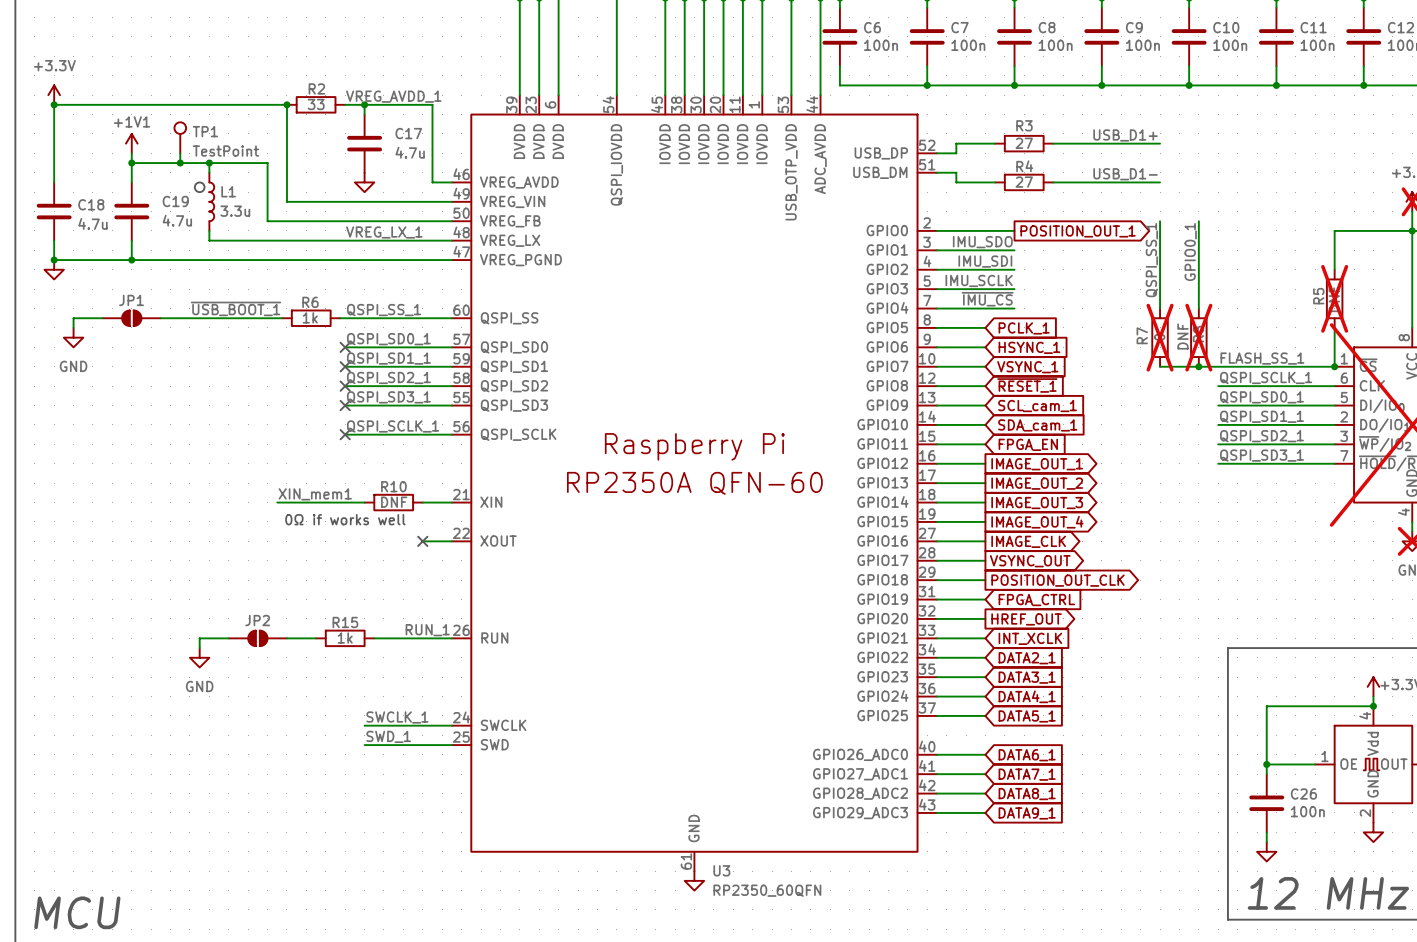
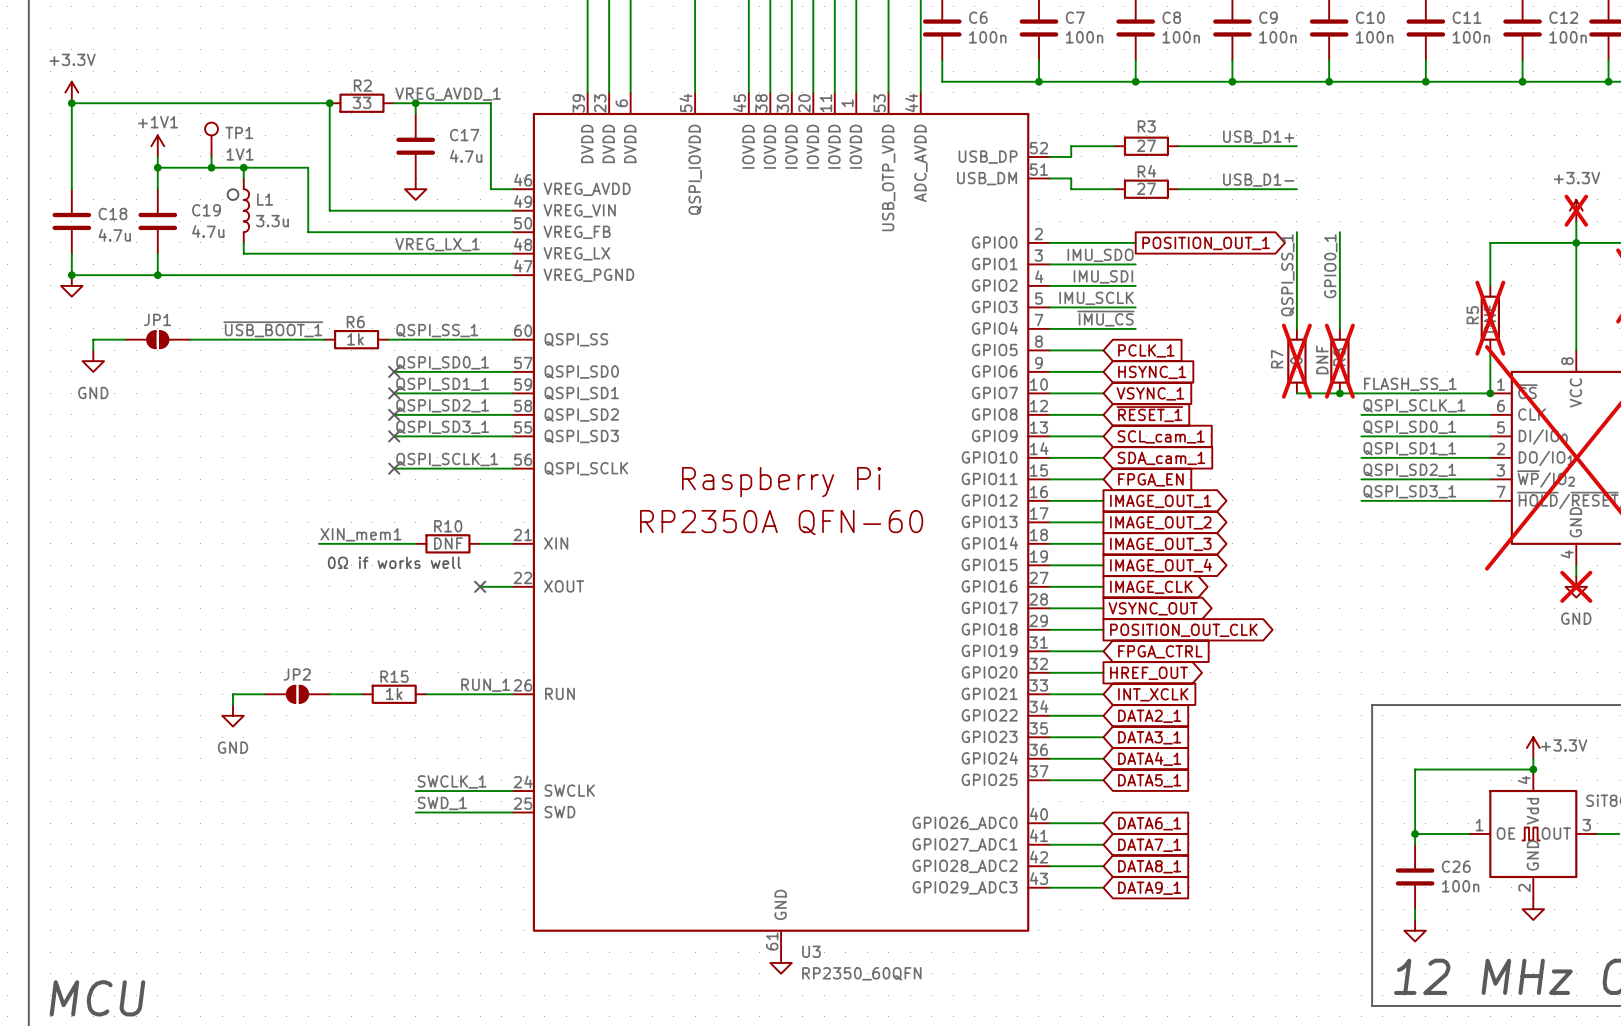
TP1 value: TestPoint (225, 151) -> 1V1 (240, 154)

